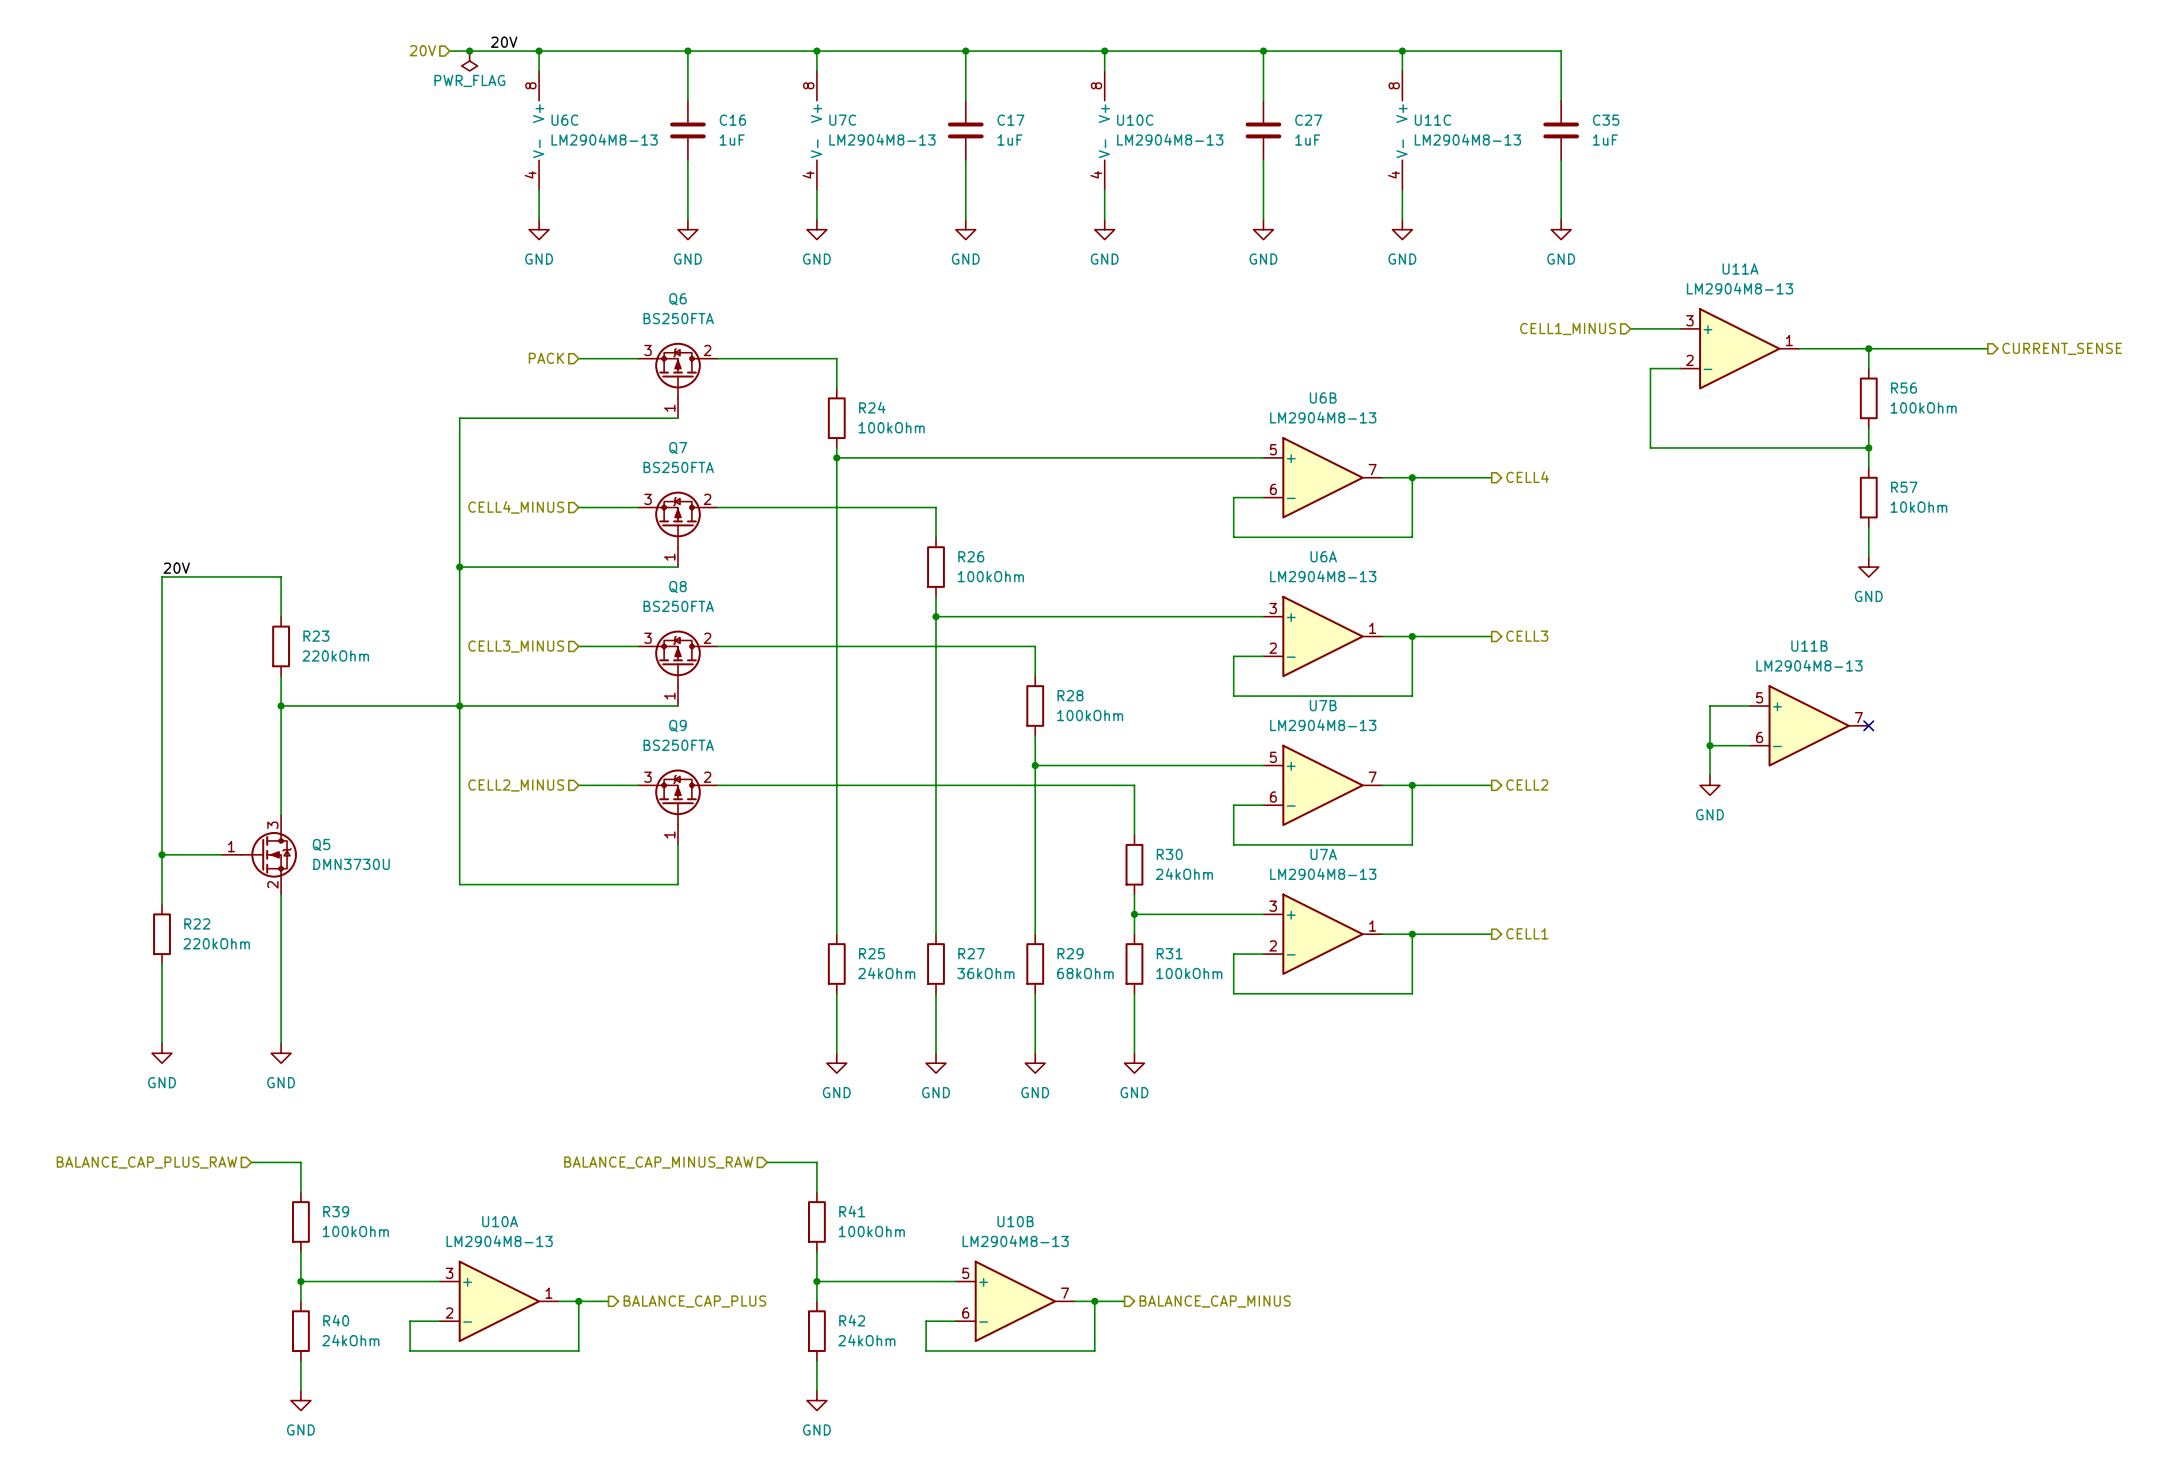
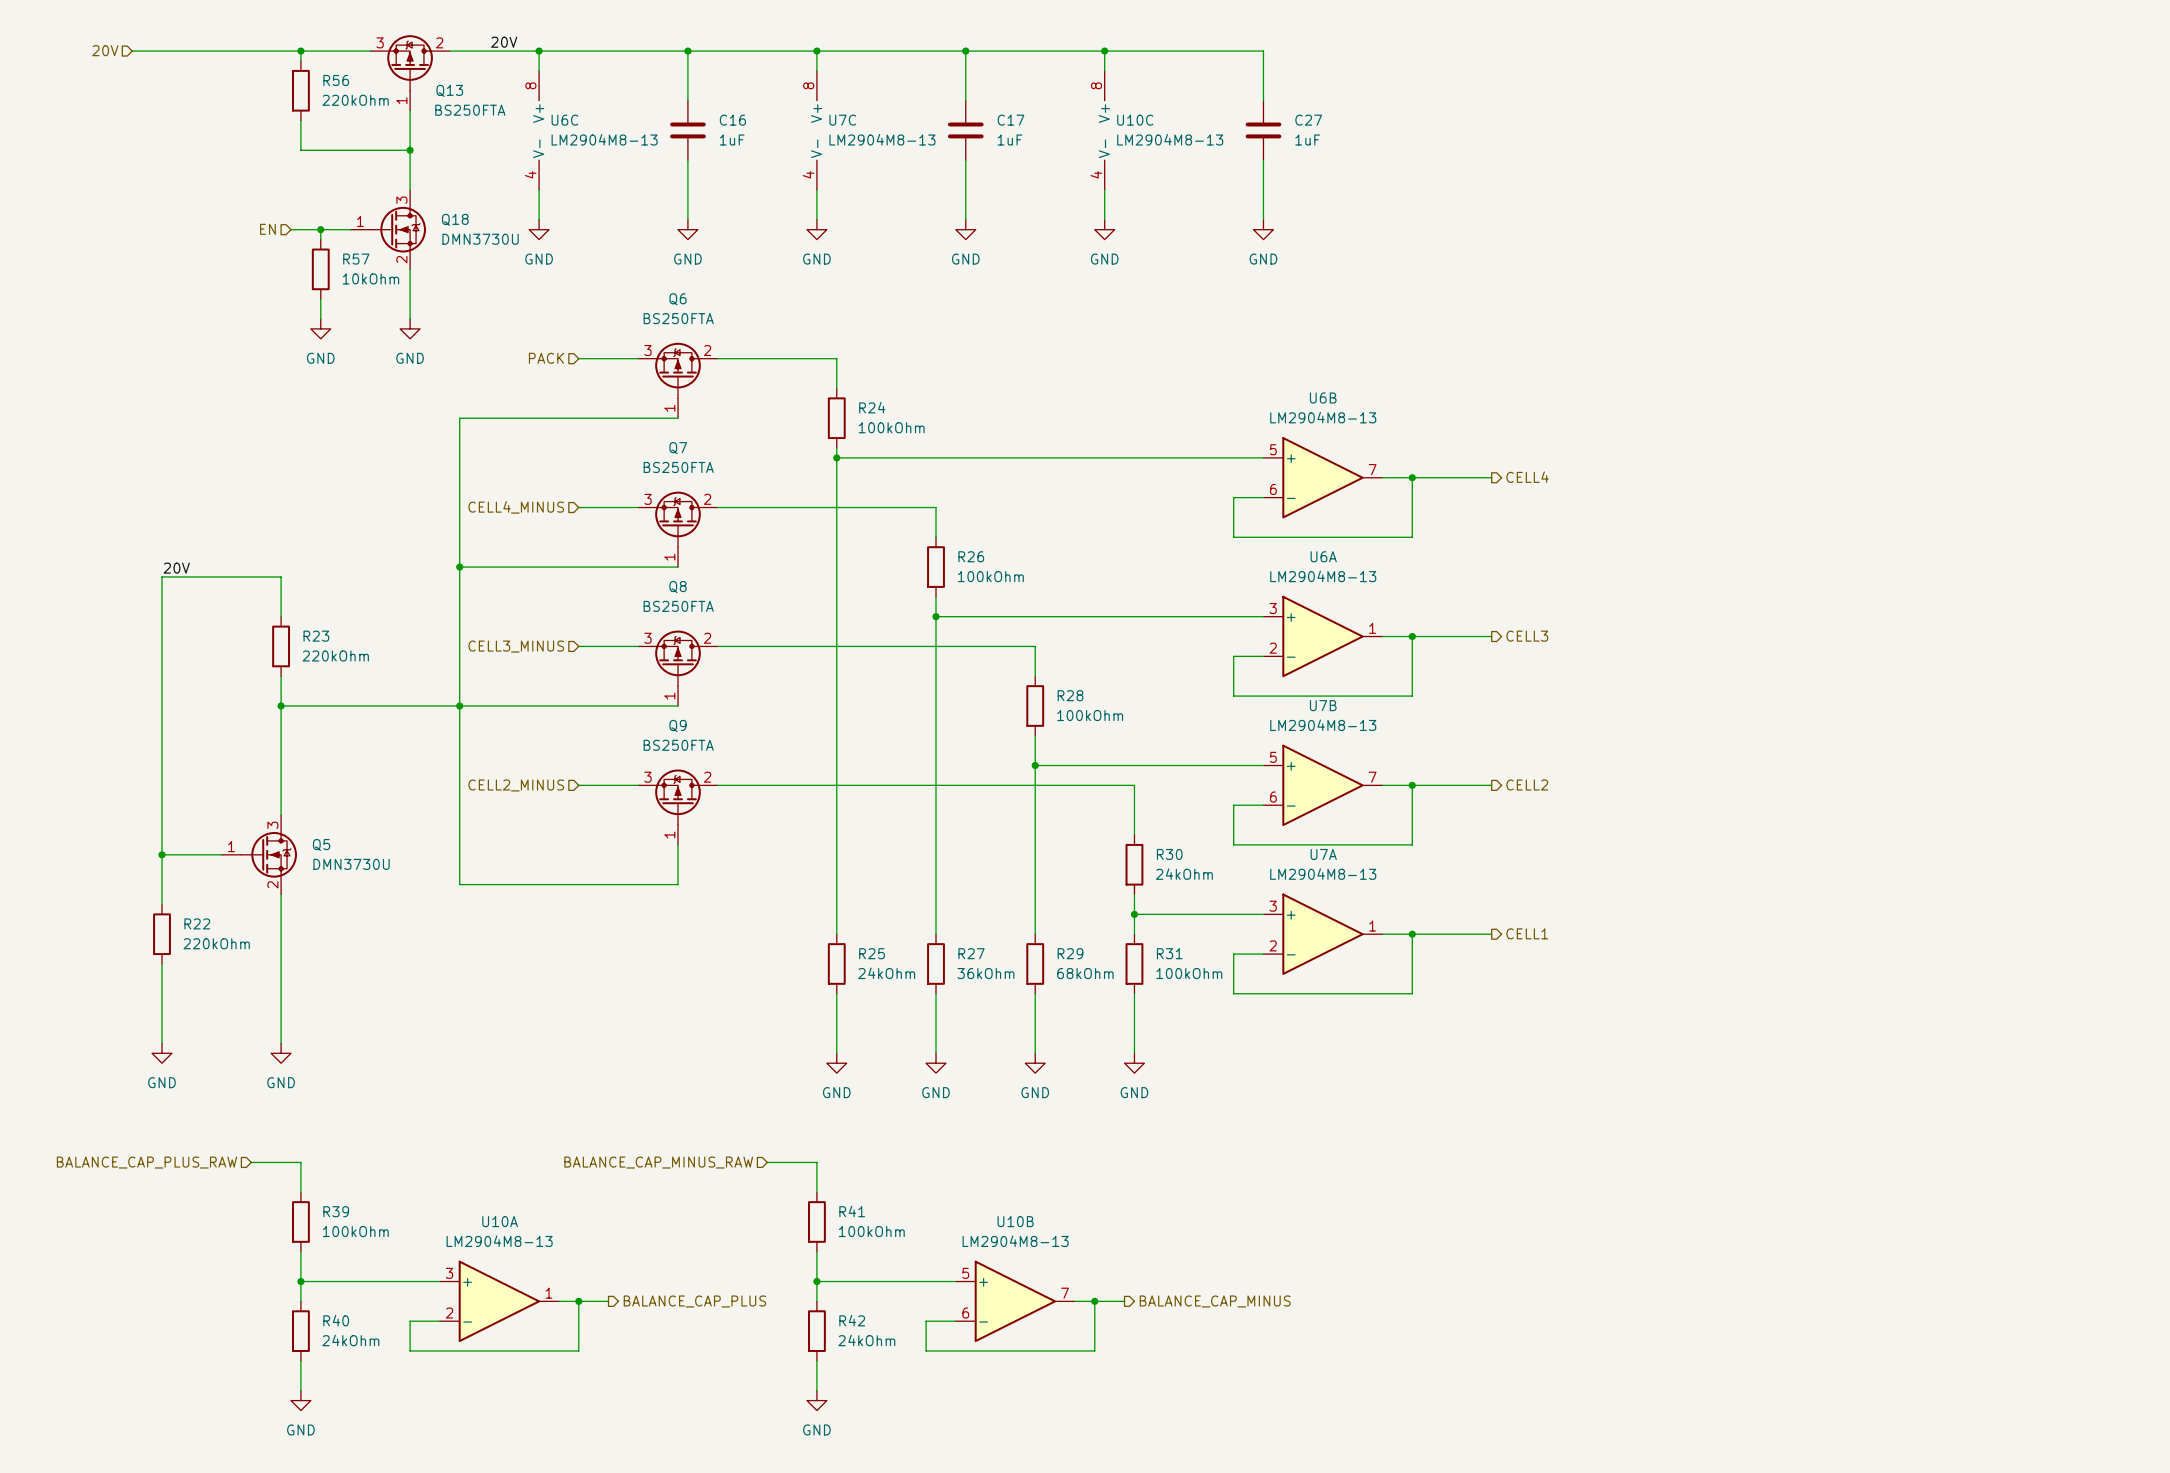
hierarchical label: none -> 20V (105, 50)
hierarchical label: 20V (422, 50) -> none
wire: none -> (132, 51) (370, 51)
wire: none -> (300, 51) (300, 60)
junction: none -> (300, 51)
junction: (469, 51) -> none
wire: (1263, 51) (1561, 51) (1561, 100) -> none
junction: (1263, 51) -> none
wire: (1402, 51) (1402, 70) -> none
junction: (1402, 51) -> none
power symbol: PWR_FLAG (469, 60) -> none
Q13: none -> BS250FTA (410, 72)
wire: none -> (410, 110) (410, 189)
wire: none -> (300, 120) (300, 150) (410, 150)
U11C: LM2904M8-13 (1402, 130) -> none
C35: 1uF (1561, 130) -> none
junction: none -> (410, 150)
wire: (1561, 160) (1561, 219) -> none
wire: (1402, 189) (1402, 219) -> none
hierarchical label: none -> EN (267, 229)
wire: none -> (291, 229) (350, 229)
wire: none -> (320, 229) (320, 239)
junction: none -> (320, 229)
Q18: none -> DMN3730U (388, 229)
power symbol: GND (1402, 229) -> none
power symbol: GND (1561, 229) -> none
wire: none -> (410, 269) (410, 318)
wire: none -> (320, 299) (320, 318)
power symbol: none -> GND (320, 328)
power symbol: none -> GND (410, 328)
wire: (1630, 328) (1680, 328) -> none
hierarchical label: CELL1_MINUS (1568, 329) -> none
U11A: LM2904M8-13 (1739, 348) -> none
wire: (1799, 348) (1987, 348) -> none
wire: (1868, 348) (1868, 368) -> none
junction: (1868, 348) -> none
hierarchical label: CURRENT_SENSE (2062, 348) -> none
wire: (1680, 368) (1650, 368) (1650, 447) (1868, 447) -> none
R56 position: (1868, 398) -> (300, 90)
R56 value: 100kOhm (1923, 407) -> 220kOhm (355, 100)
wire: (1868, 428) (1868, 467) -> none
junction: (1868, 447) -> none
R57 position: (1868, 497) -> (320, 269)
wire: (1868, 527) (1868, 557) -> none
power symbol: GND (1868, 567) -> none
wire: (1749, 705) (1710, 705) (1710, 775) -> none
U11B: LM2904M8-13 (1809, 725) -> none
no-connect mark: (1868, 725) -> none
wire: (1710, 745) (1749, 745) -> none
junction: (1710, 745) -> none
power symbol: GND (1710, 785) -> none

